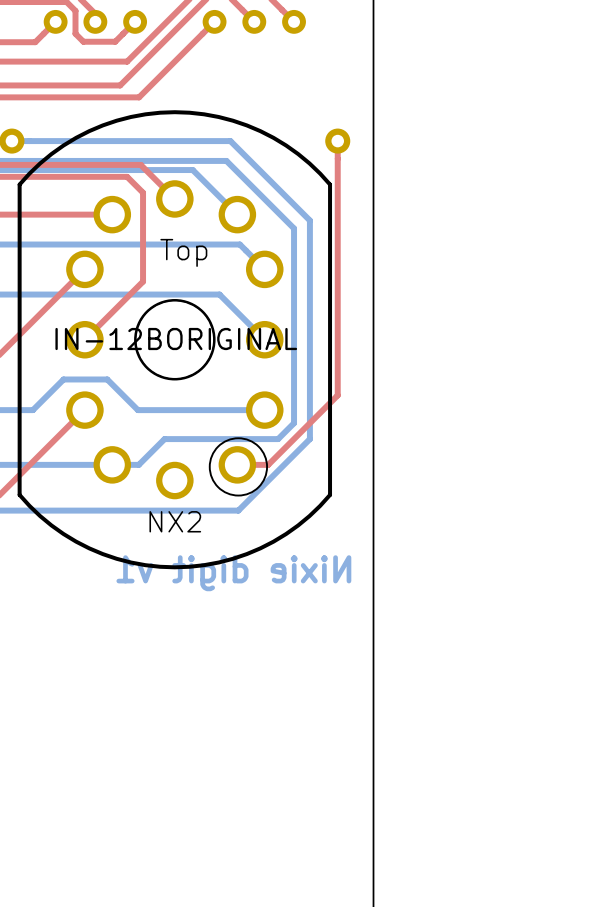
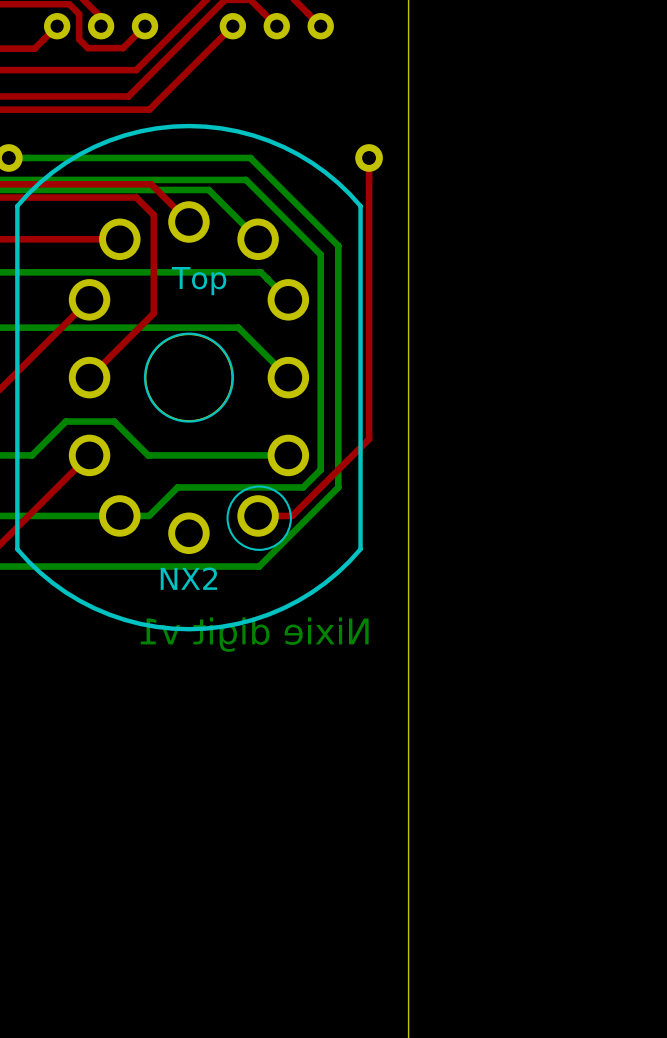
NX2 value: IN-12BORIGINAL (176, 339) -> none

